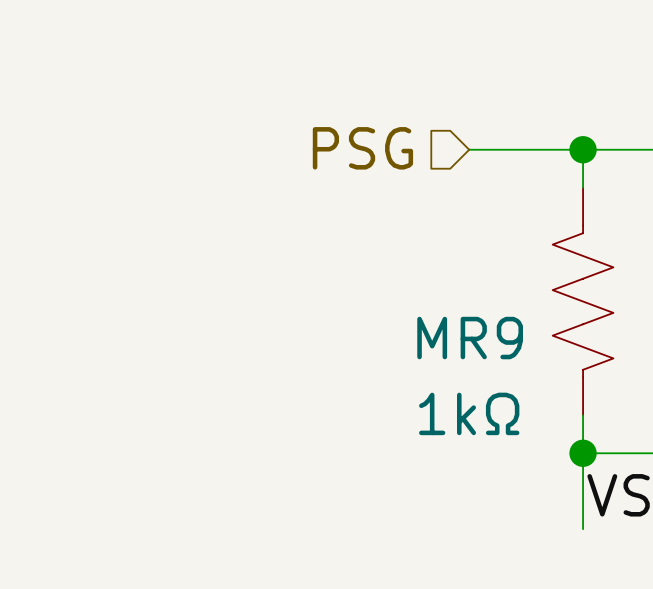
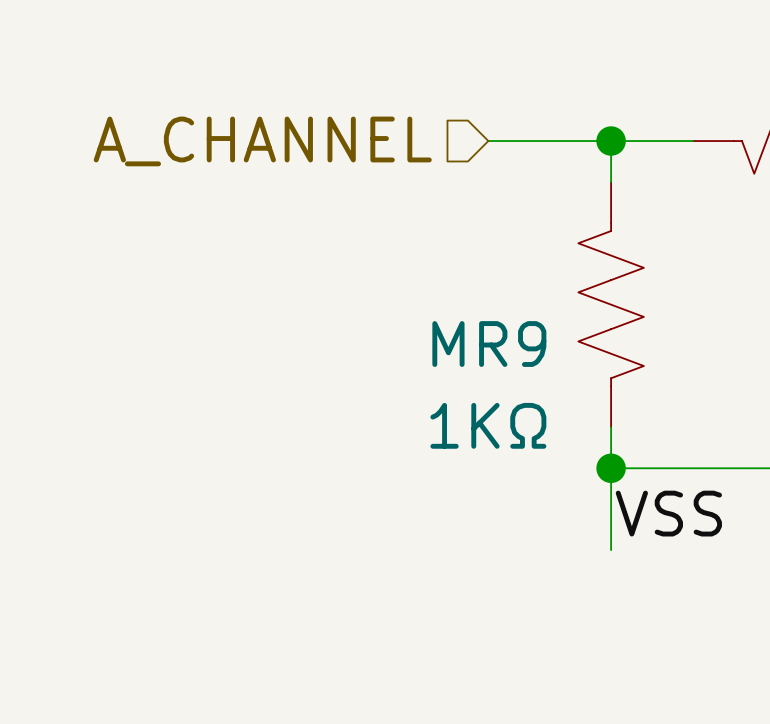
hierarchical label: PSG (362, 148) -> A_CHANNEL (262, 141)
MR9 value: 1kΩ (469, 413) -> 1KΩ (488, 425)

